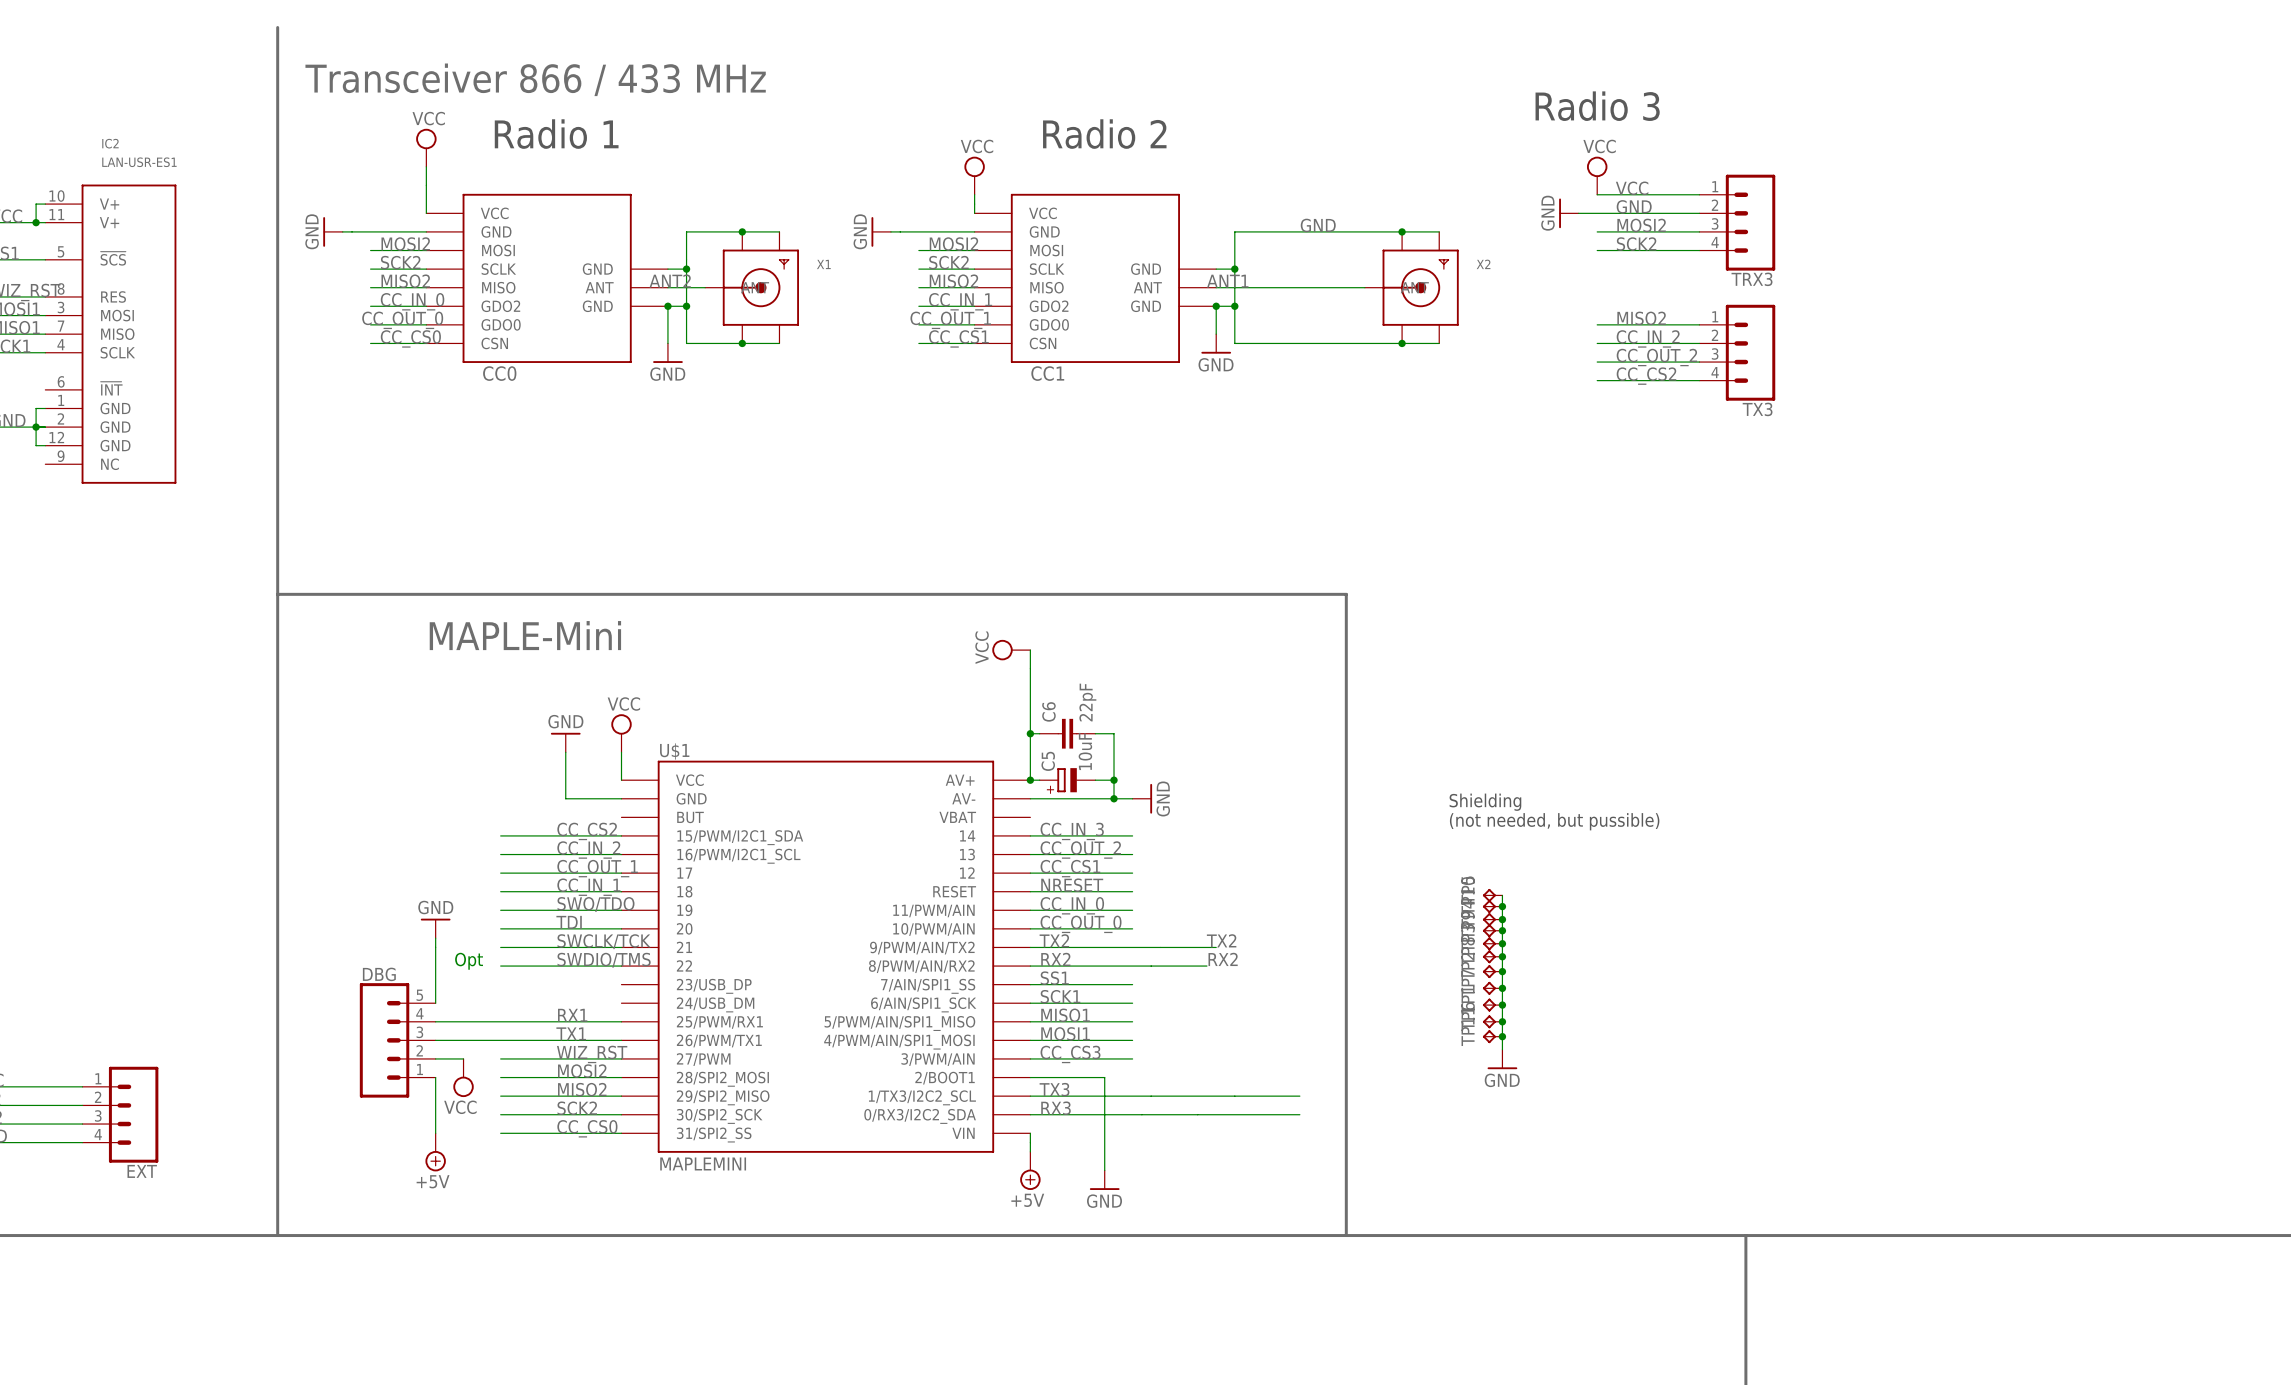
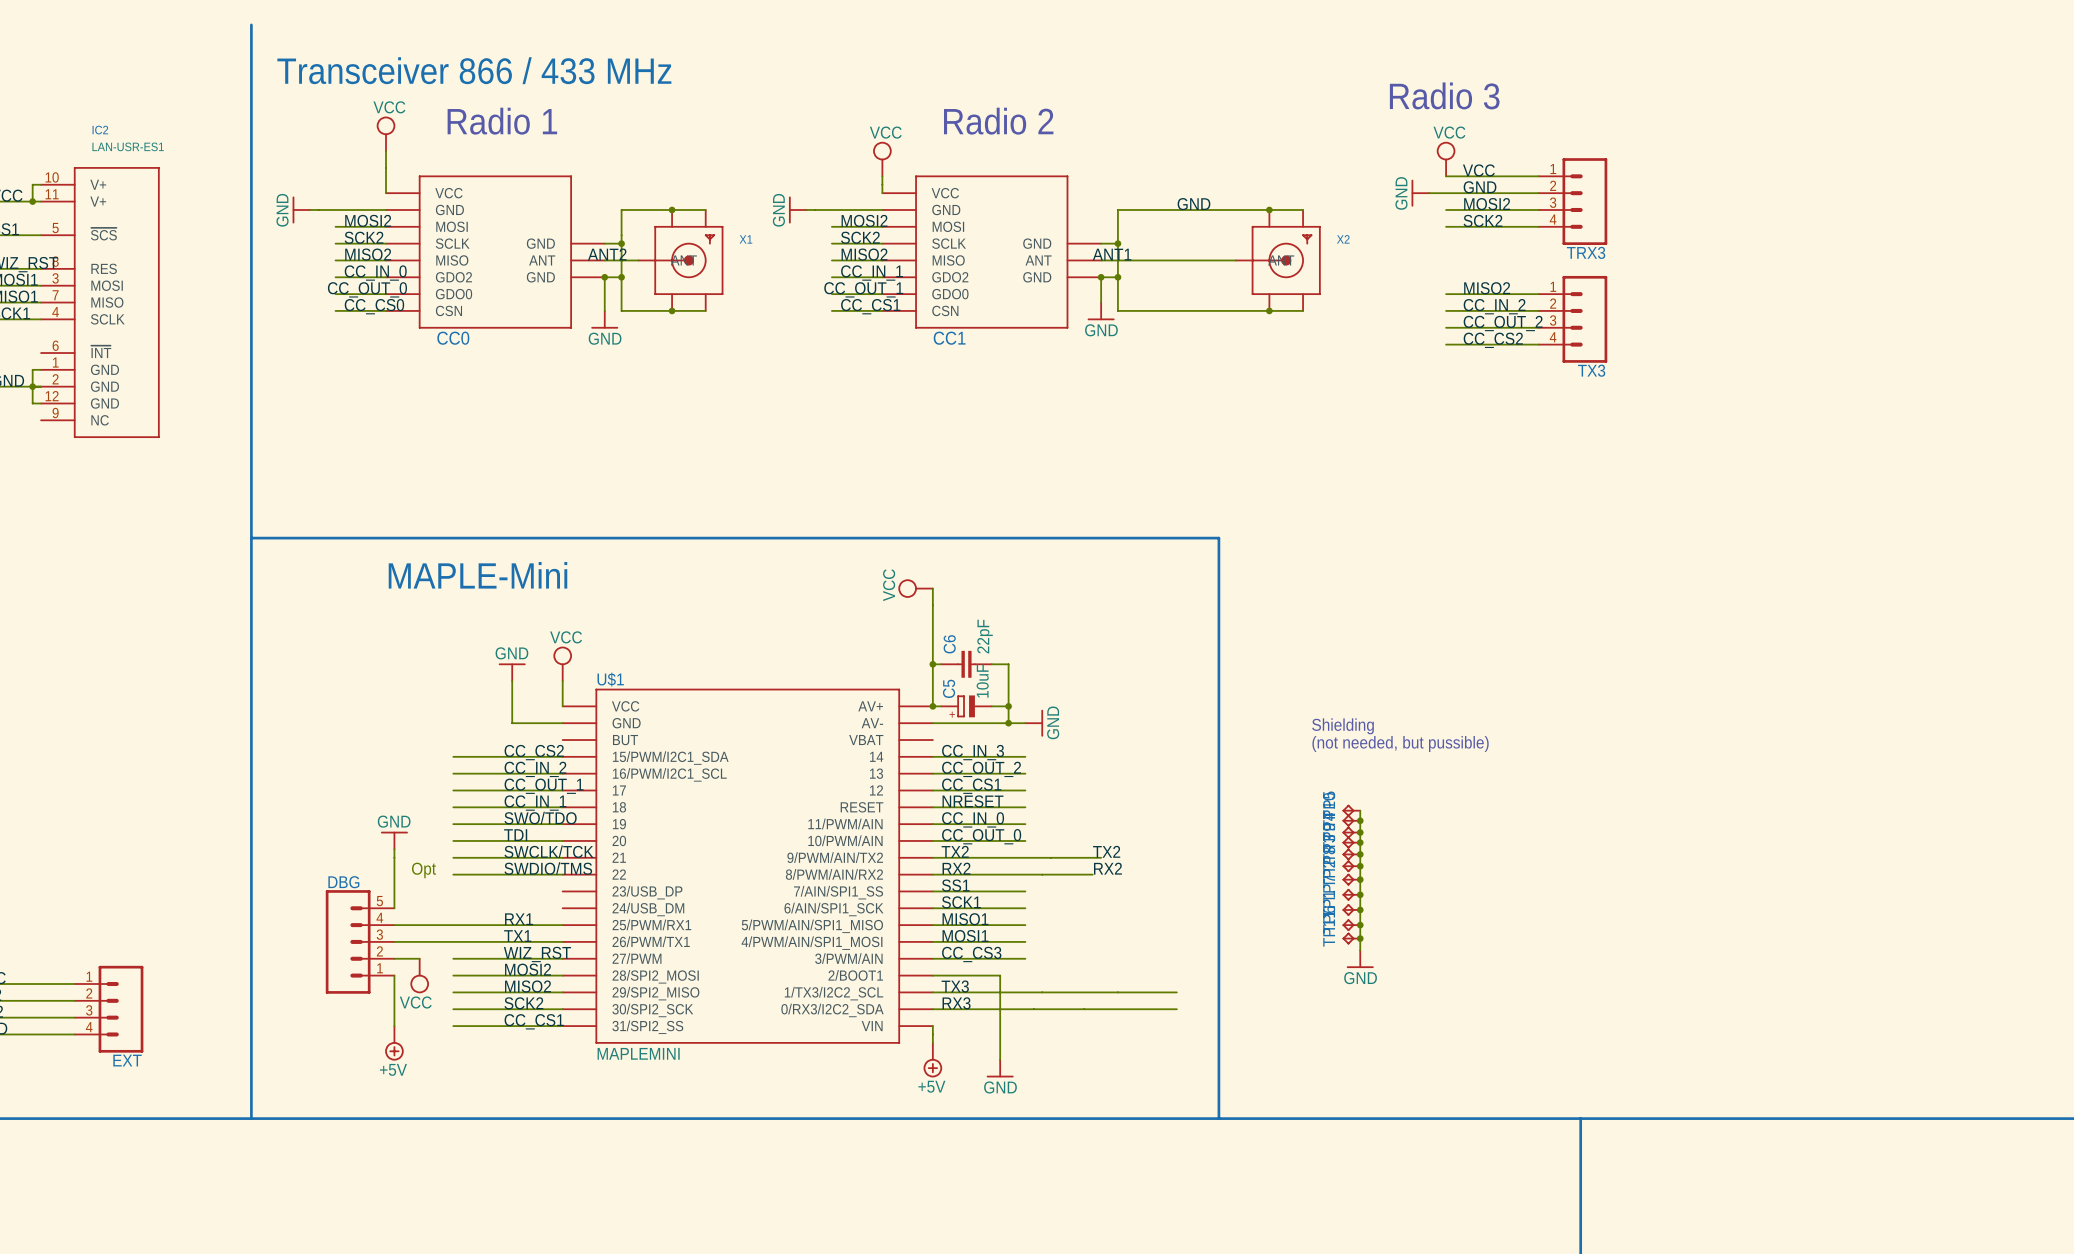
label: CC_CS0 (587, 1128) -> CC_CS1 (534, 1021)

